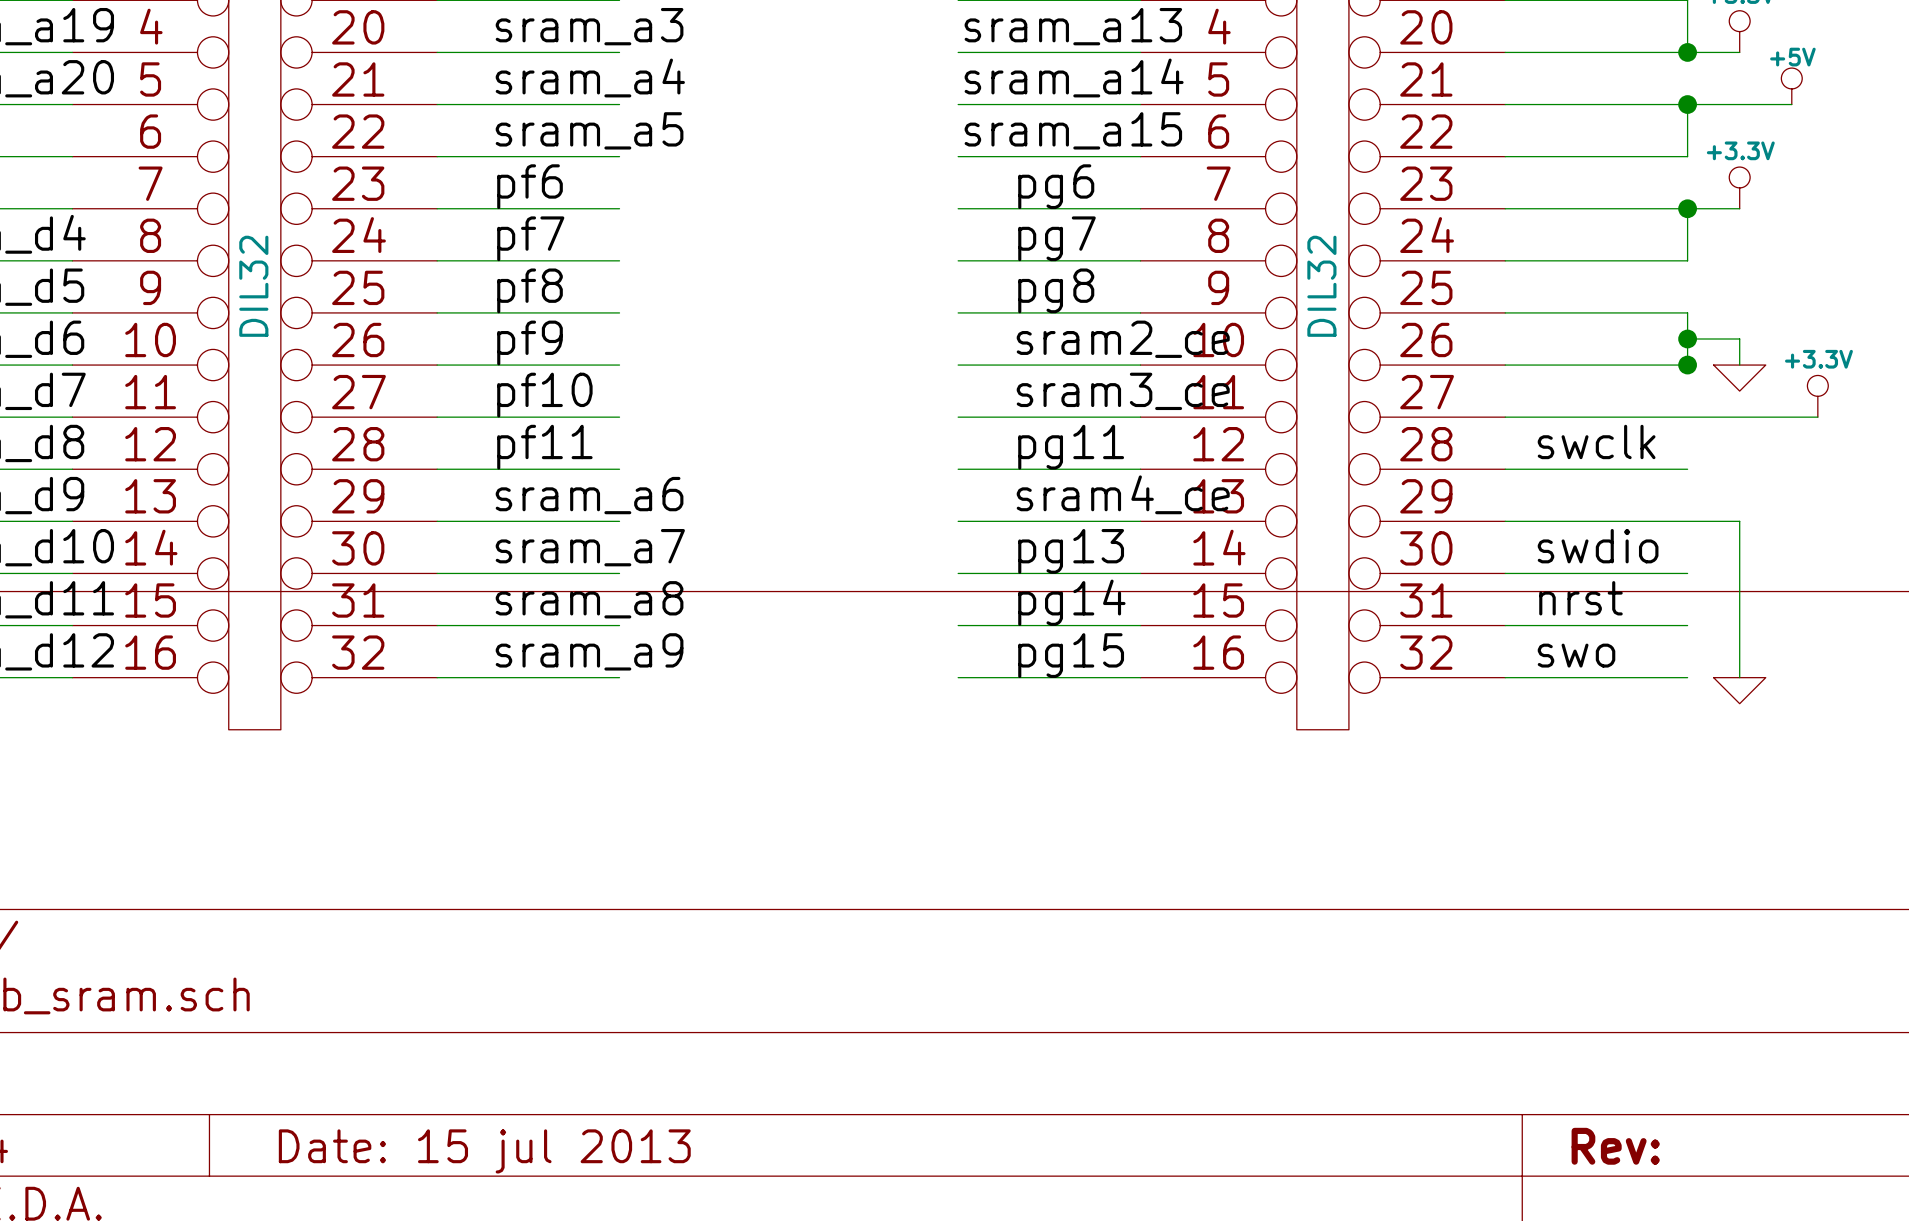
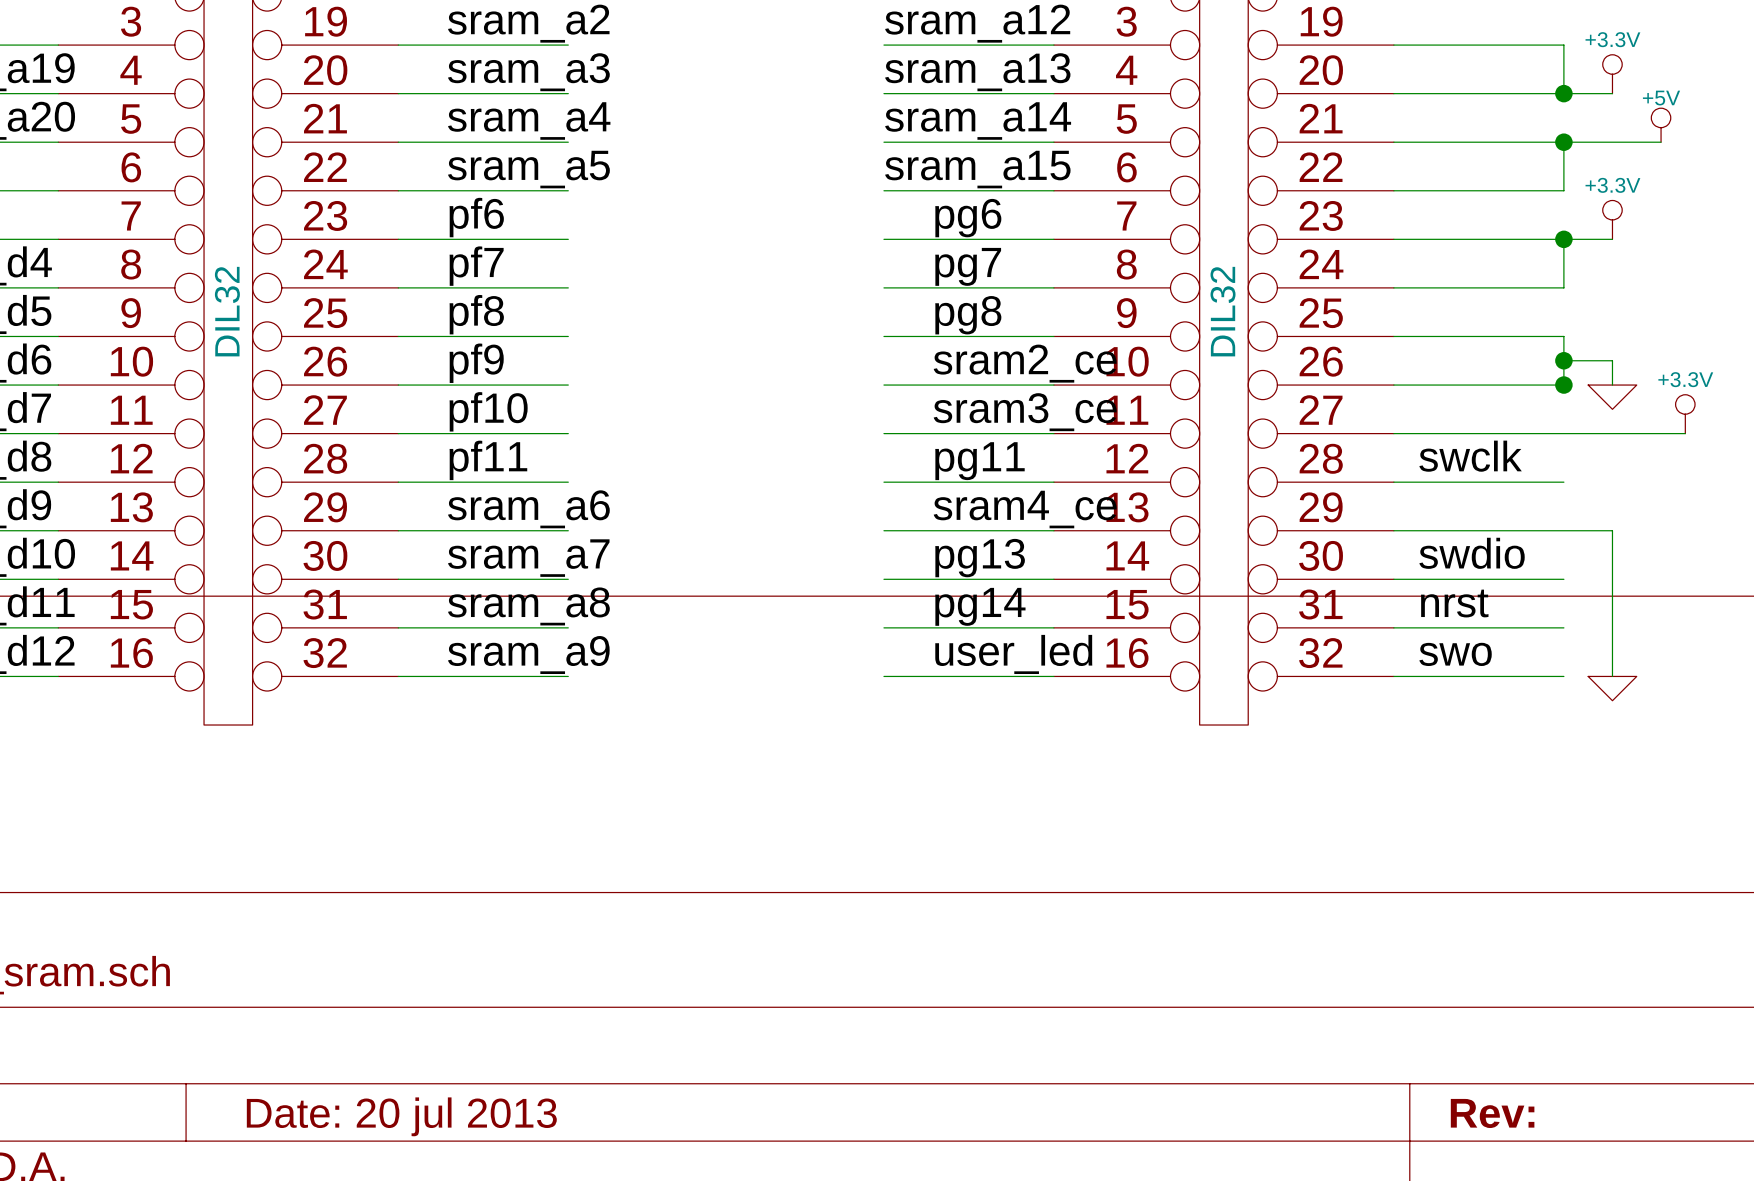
label: pg15 (1071, 655) -> user_led (1013, 654)
title block: Date: 15 jul 2013 (484, 1151) -> Date: 20 jul 2013 (401, 1116)

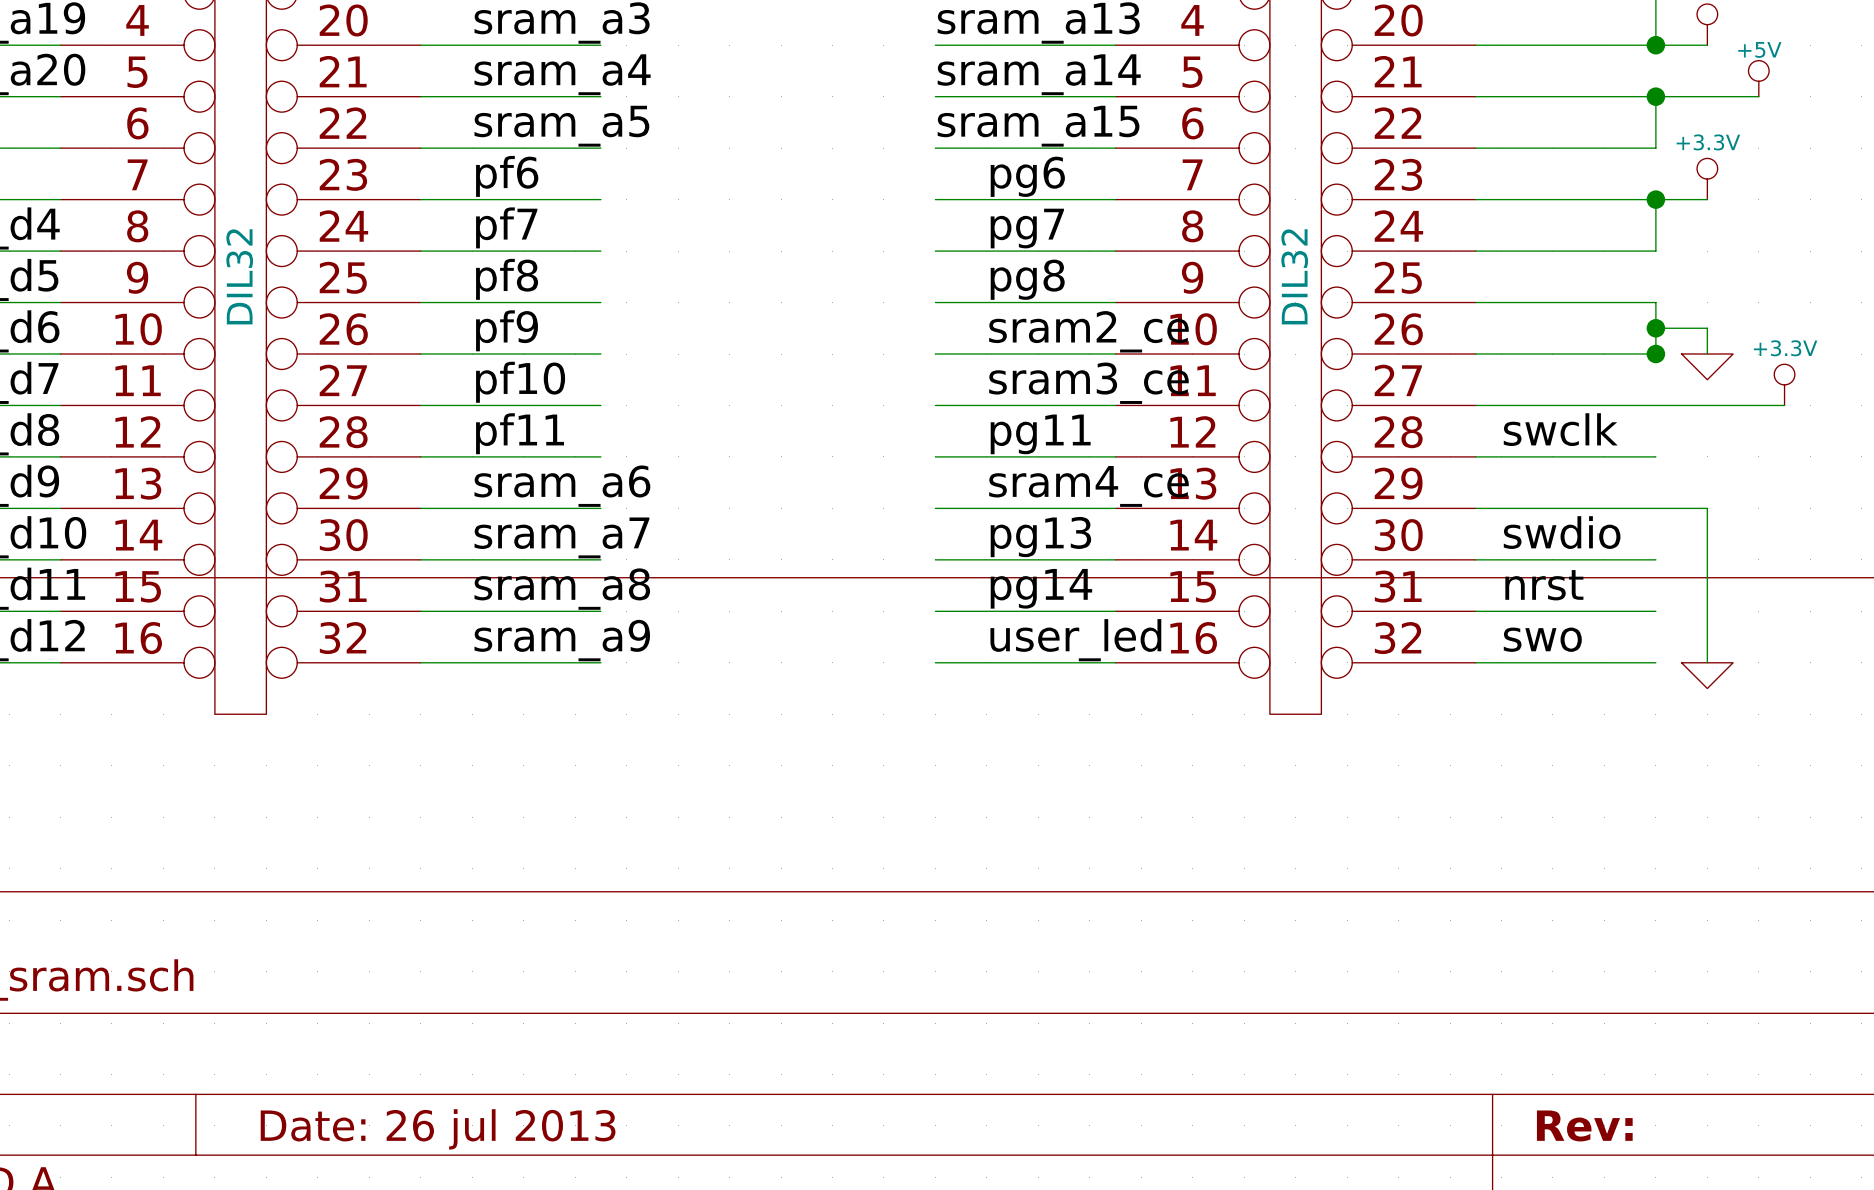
title block: Date: 20 jul 2013 (401, 1116) -> Date: 26 jul 2013 (438, 1129)

